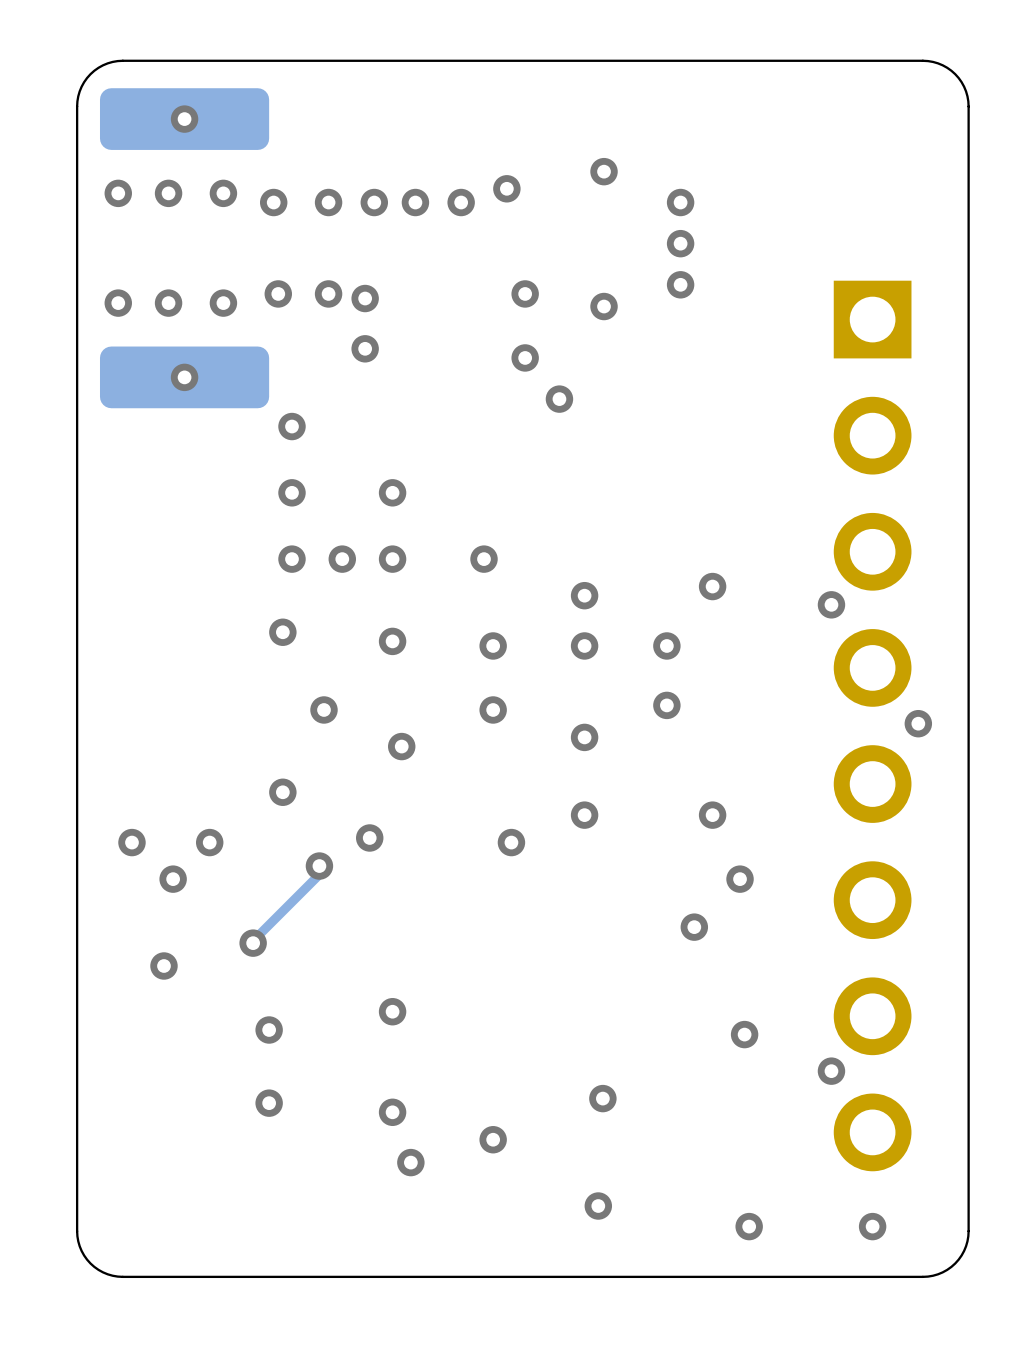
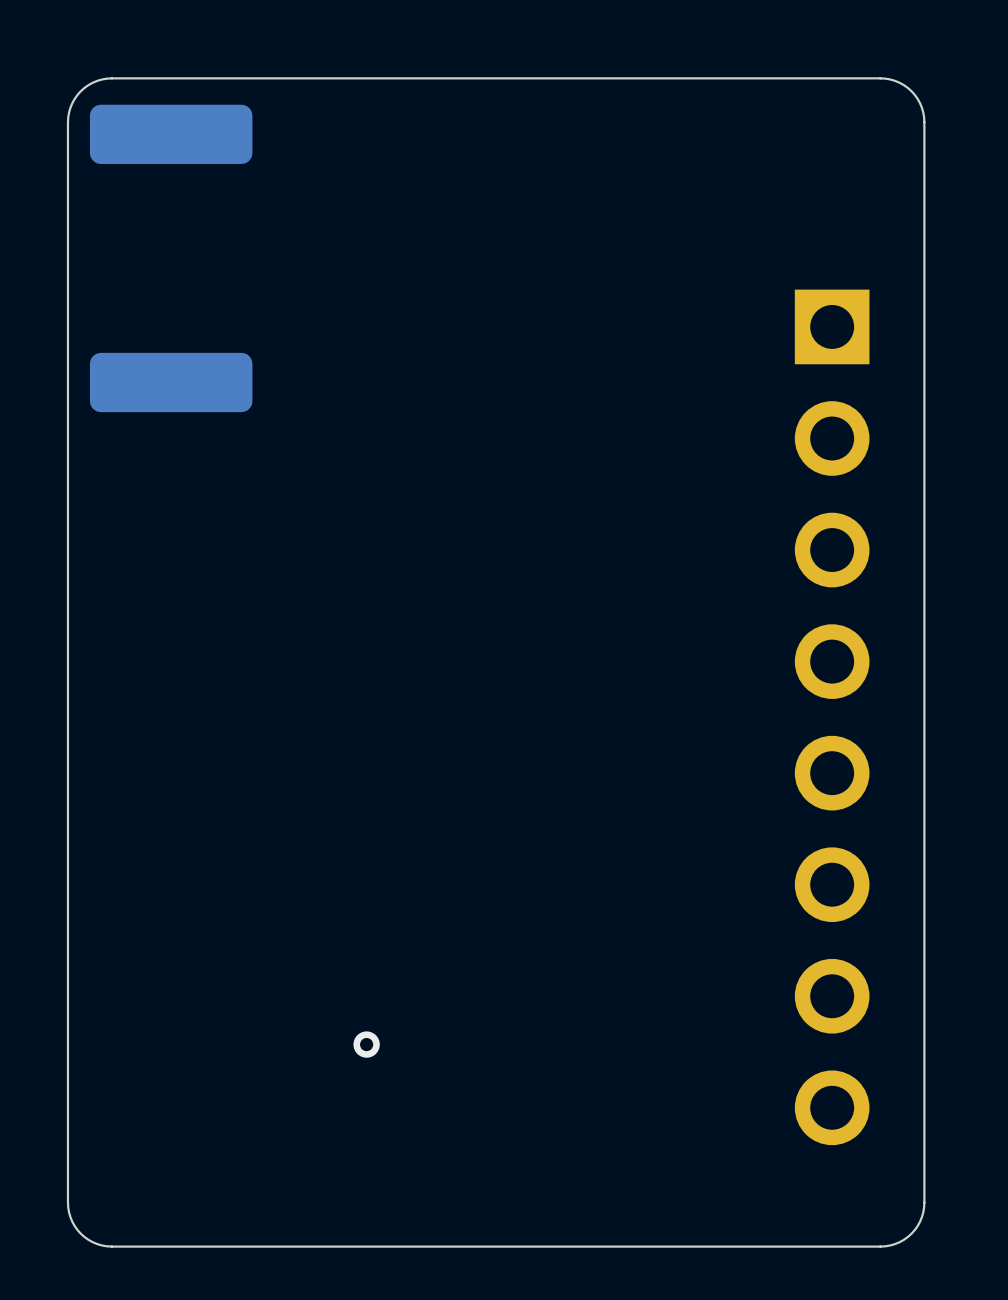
via: (184, 119) -> none
via: (604, 171) -> none
via: (506, 188) -> none
via: (118, 193) -> none
via: (168, 193) -> none
via: (223, 193) -> none
via: (273, 202) -> none
via: (328, 202) -> none
via: (374, 202) -> none
via: (415, 202) -> none
via: (461, 202) -> none
via: (680, 202) -> none
via: (680, 243) -> none
via: (680, 284) -> none
via: (278, 293) -> none
via: (328, 293) -> none
via: (525, 293) -> none
via: (365, 298) -> none
via: (118, 303) -> none
via: (168, 303) -> none
via: (223, 303) -> none
via: (604, 306) -> none
via: (365, 348) -> none
via: (525, 357) -> none
via: (184, 377) -> none
via: (559, 399) -> none
via: (292, 426) -> none
via: (292, 492) -> none
via: (392, 492) -> none
via: (292, 559) -> none
via: (342, 559) -> none
via: (392, 559) -> none
via: (484, 559) -> none
via: (712, 586) -> none
via: (584, 595) -> none
via: (831, 604) -> none
via: (282, 632) -> none
via: (392, 641) -> none
via: (493, 645) -> none
via: (584, 645) -> none
via: (666, 645) -> none
via: (666, 705) -> none
via: (324, 709) -> none
via: (493, 709) -> none
via: (918, 723) -> none
via: (584, 737) -> none
via: (401, 746) -> none
via: (282, 792) -> none
via: (584, 815) -> none
via: (712, 815) -> none
via: (369, 837) -> none
via: (131, 842) -> none
via: (209, 842) -> none
via: (511, 842) -> none
track: (319, 866) (319, 874) (253, 940) (253, 943) -> none
via: (319, 866) -> none
via: (173, 879) -> none
via: (740, 879) -> none
via: (694, 927) -> none
via: (253, 943) -> none
via: (163, 966) -> none
via: (392, 1011) -> none
via: (269, 1030) -> none
via: (744, 1034) -> none
via: none -> (366, 1044)
via: (831, 1071) -> none
via: (602, 1098) -> none
via: (269, 1103) -> none
via: (392, 1112) -> none
via: (493, 1139) -> none
via: (410, 1162) -> none
via: (598, 1206) -> none
via: (749, 1226) -> none
via: (872, 1226) -> none

